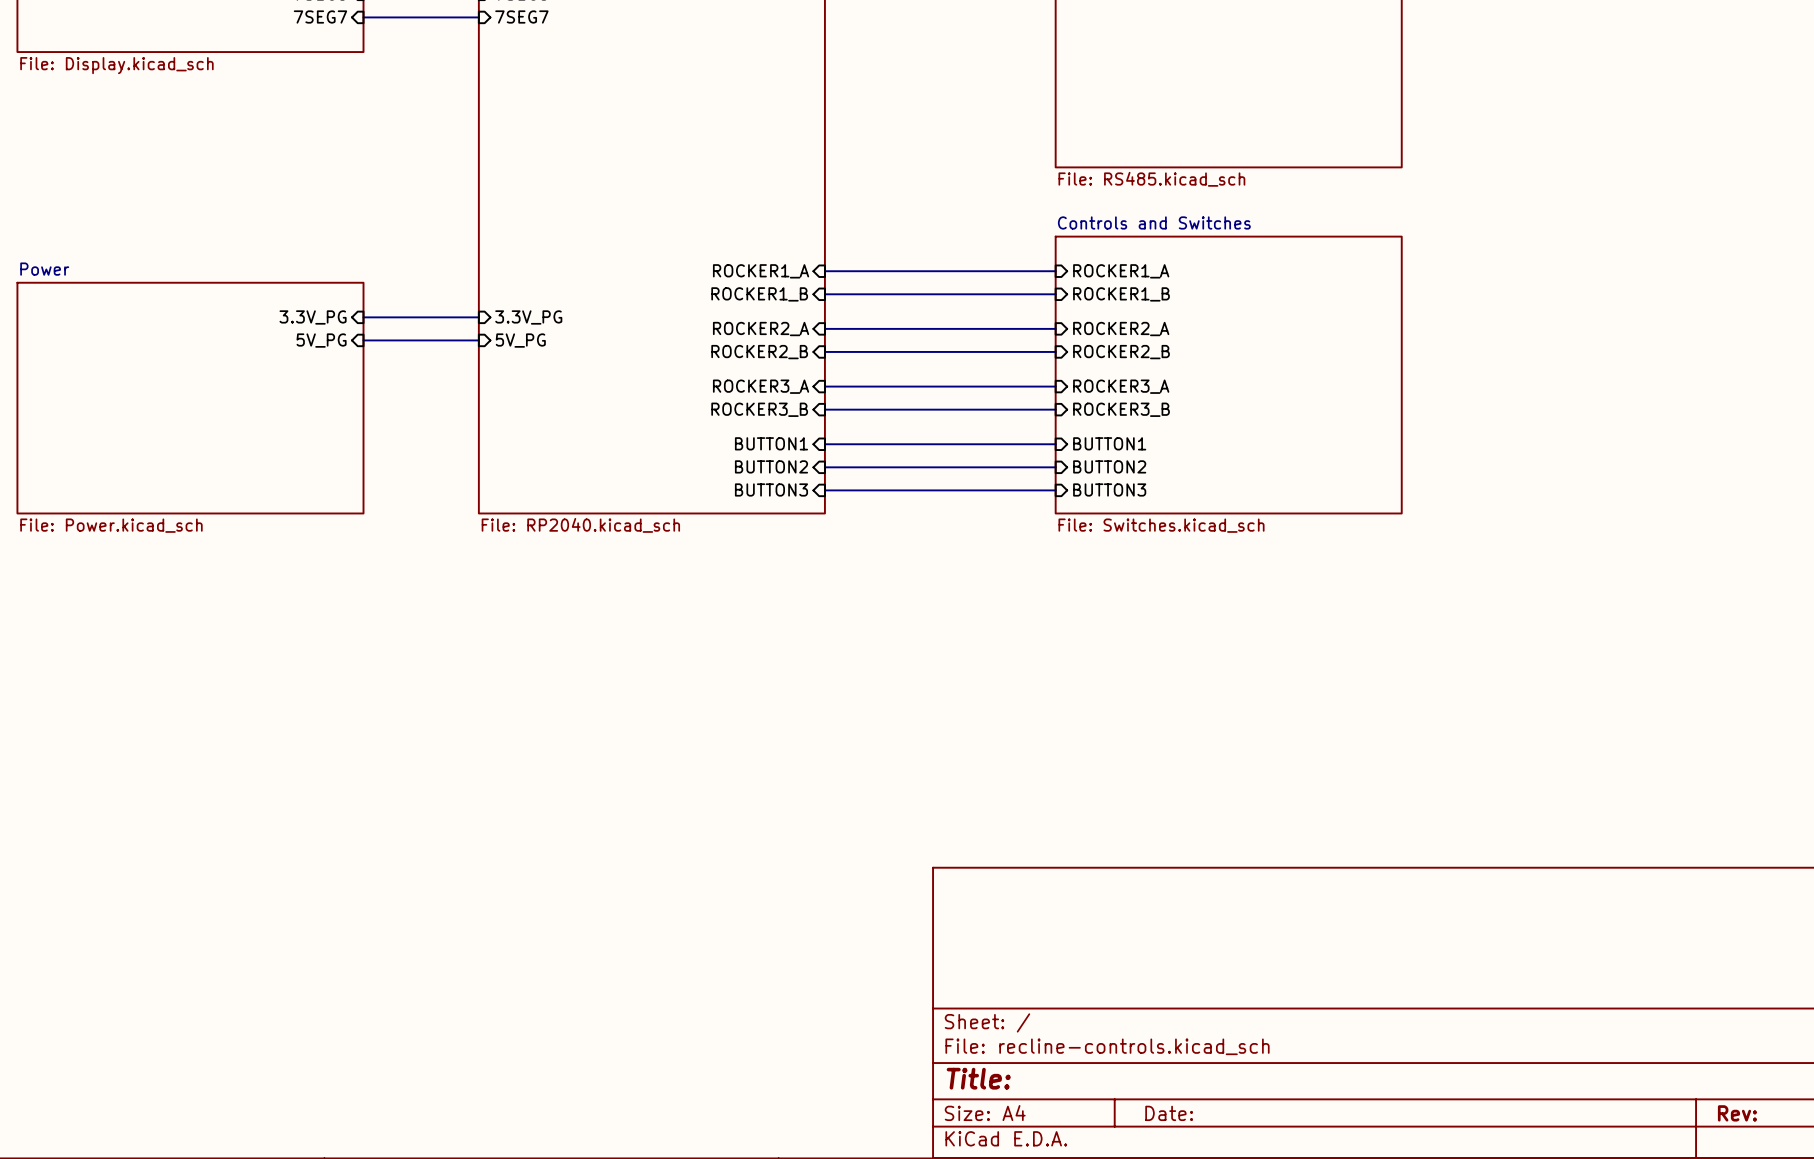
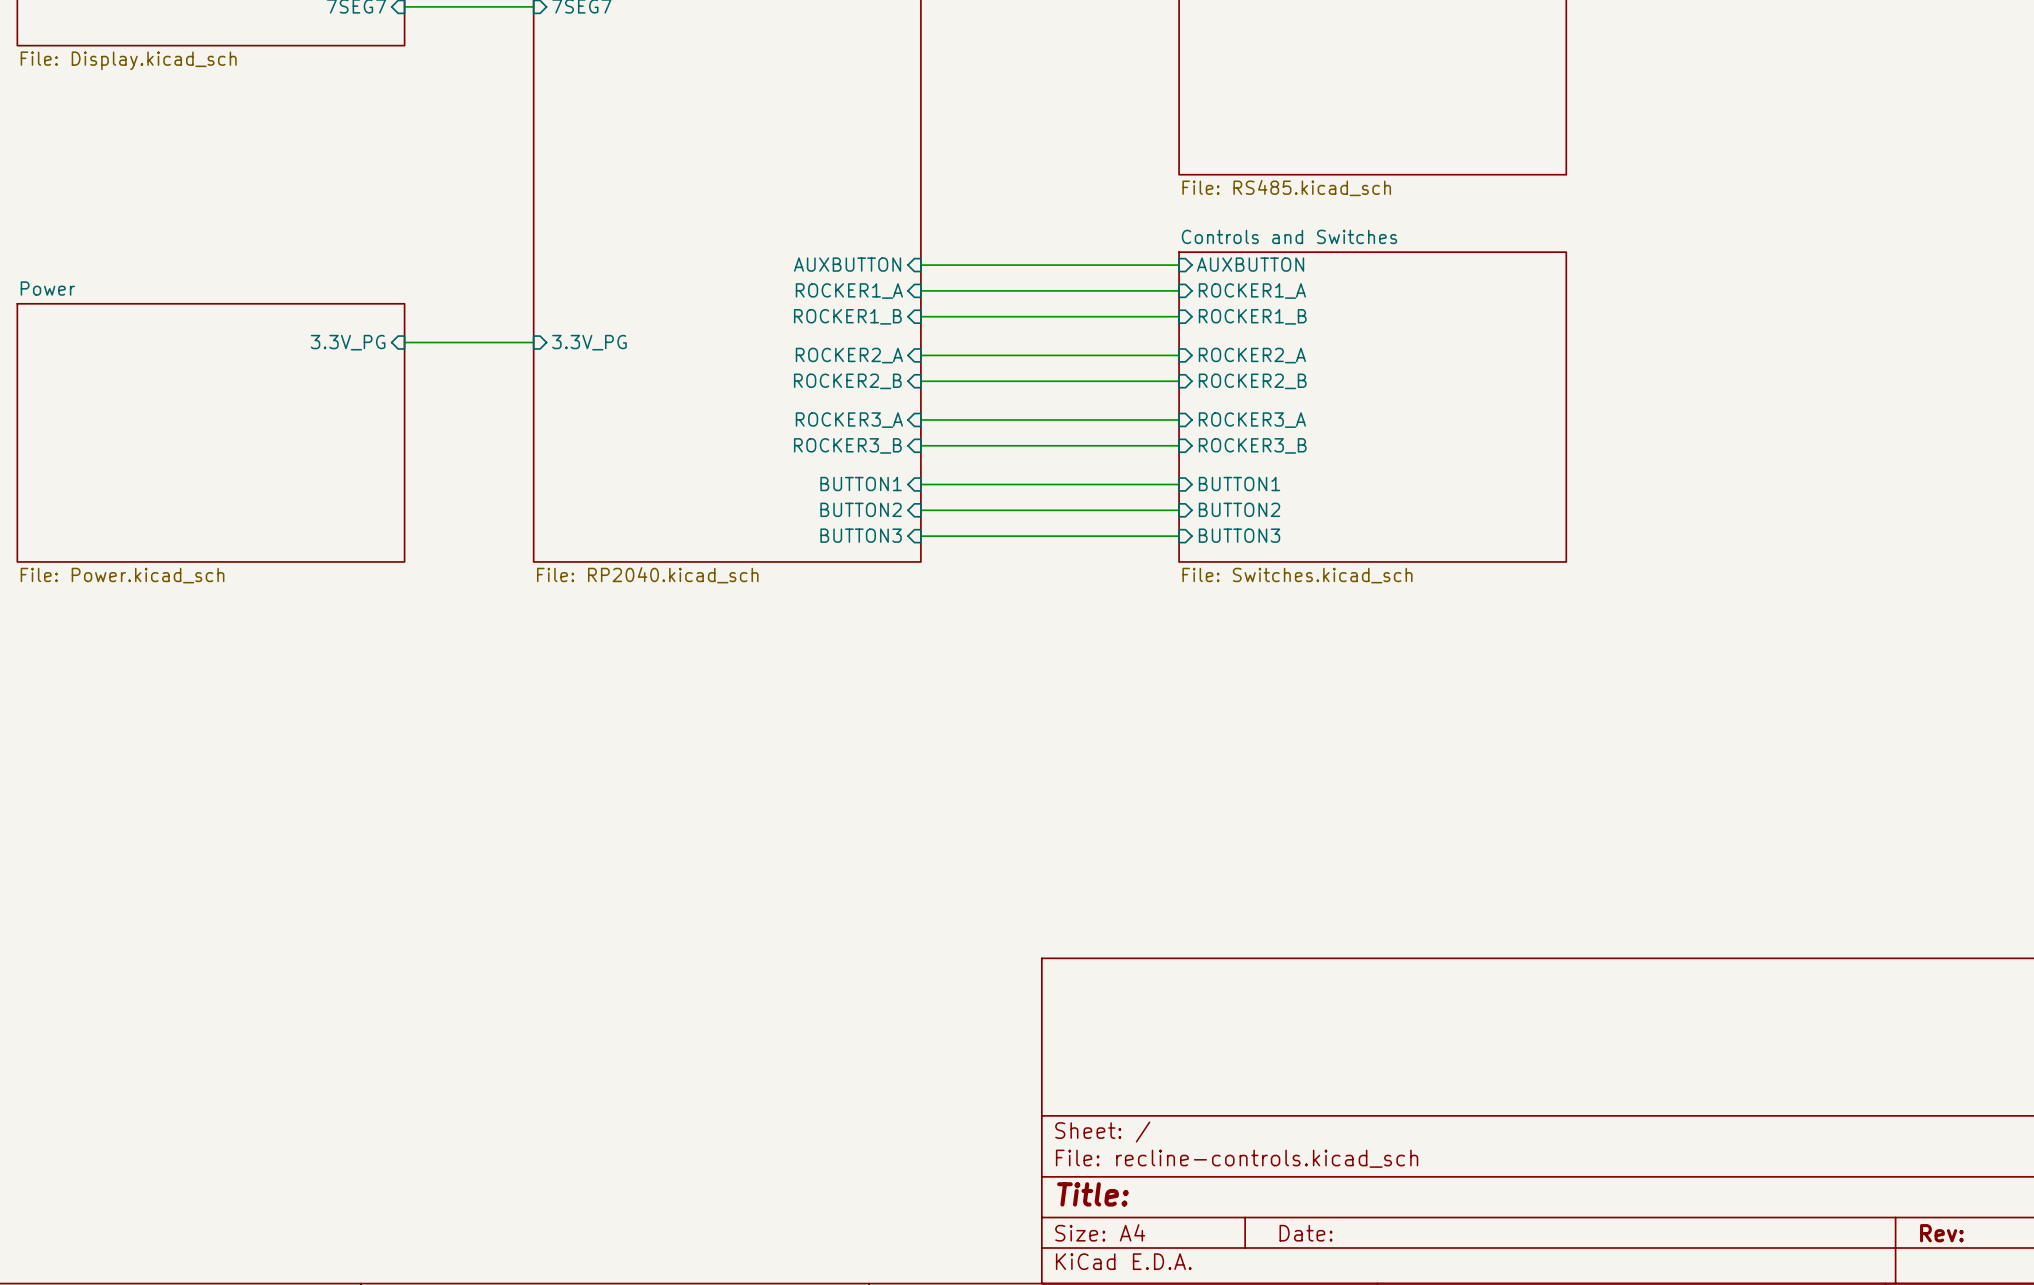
sheet pin: none -> AUXBUTTON (847, 264)
sheet pin: none -> AUXBUTTON (1250, 264)
wire: none -> (920, 265) (1179, 265)
sheet pin: 5V_PG (321, 340) -> none
wire: (363, 340) (478, 340) -> none
sheet pin: 5V_PG (520, 340) -> none

